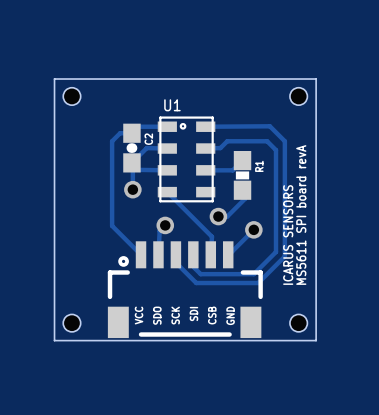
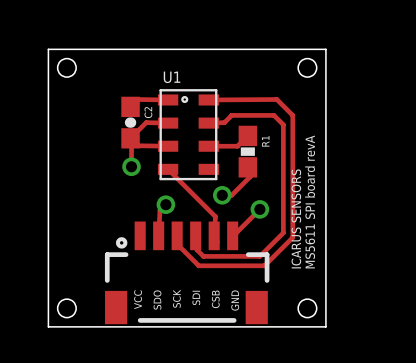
track: (167, 126) (131, 126) (131, 133) (120, 133) (112, 141) (112, 225) (141, 254) -> (168, 99) (137, 99) (130, 106)

